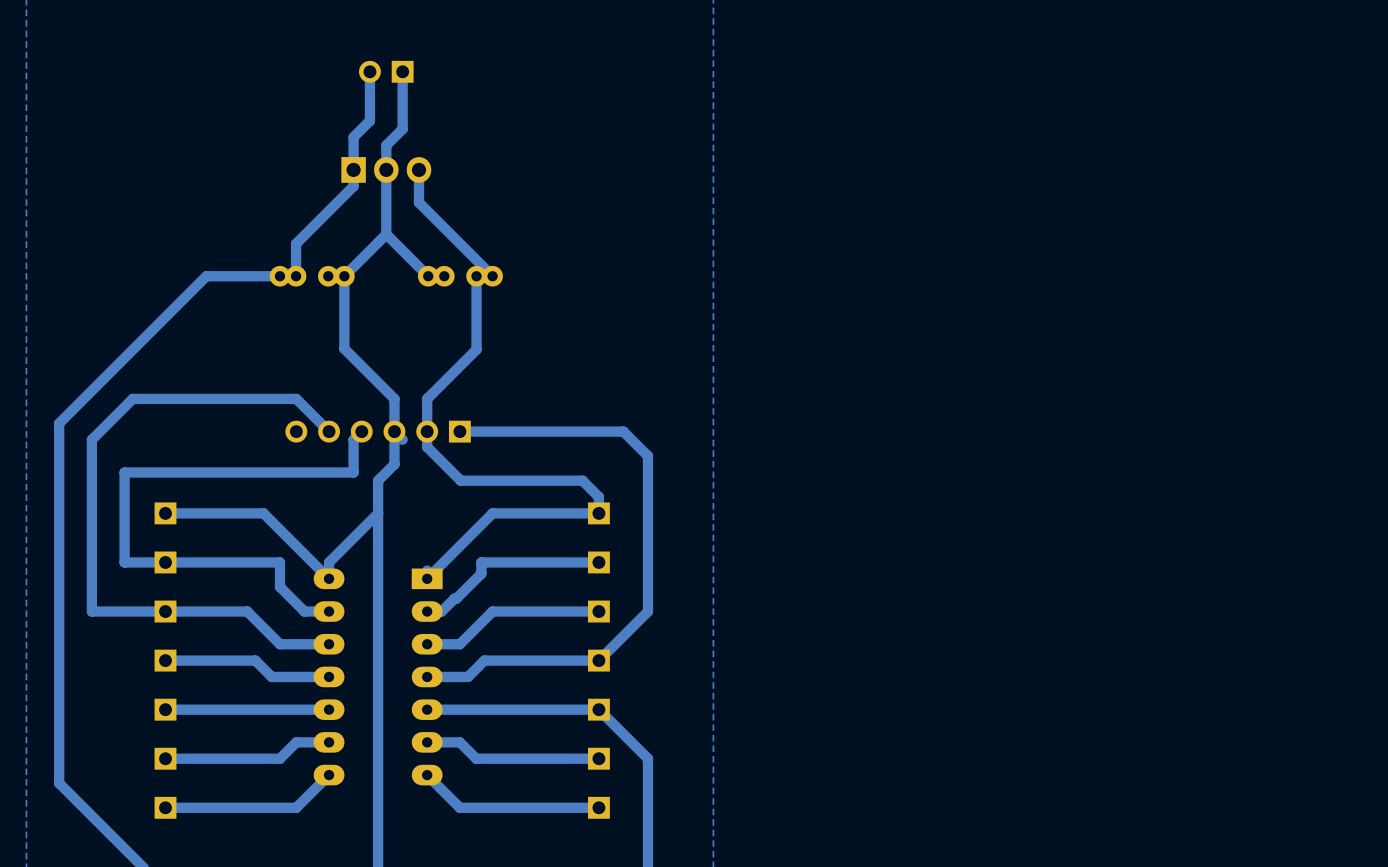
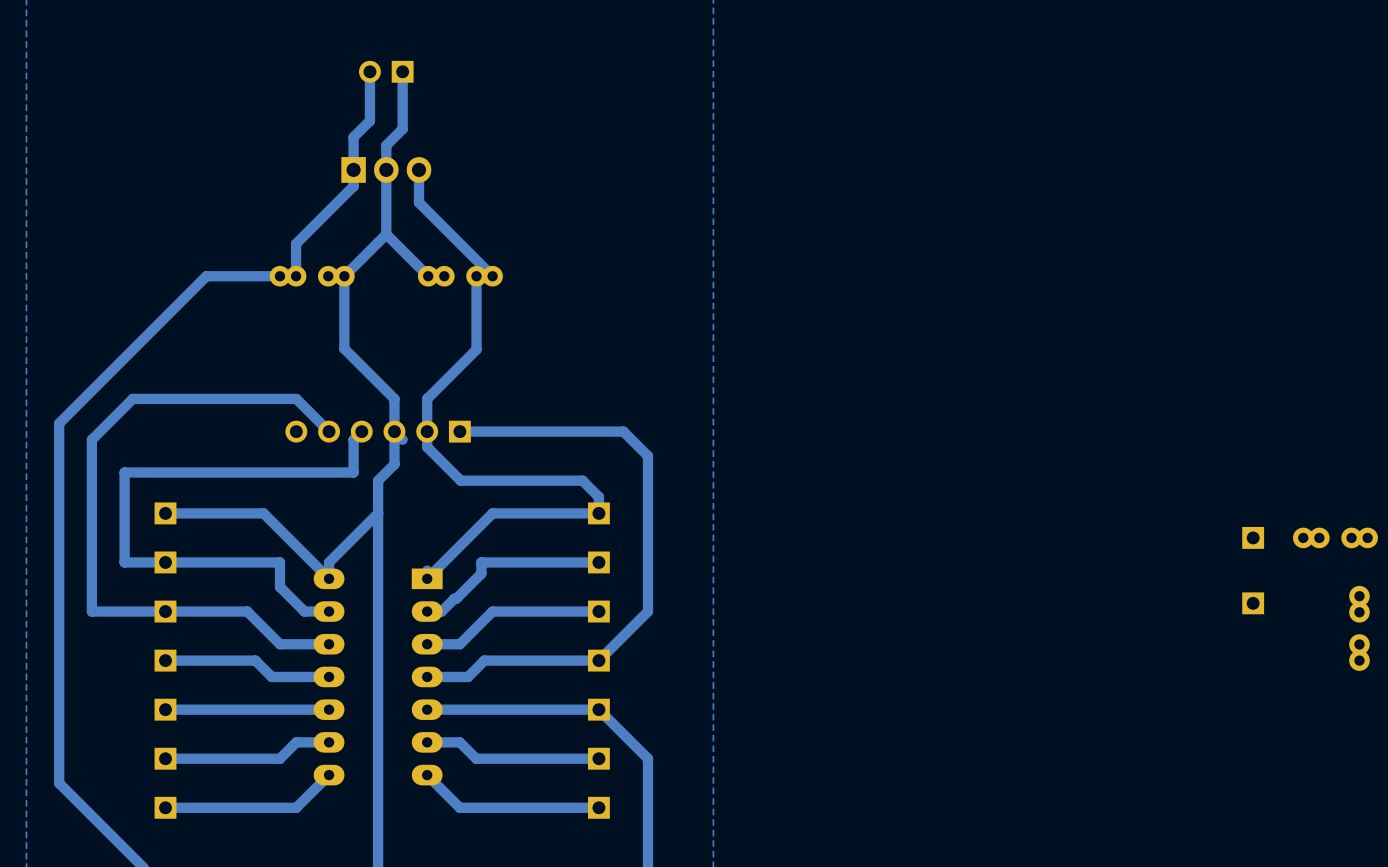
part: none -> (1253, 537)
part: none -> (1335, 537)
part: none -> (1253, 603)
part: none -> (1359, 628)

